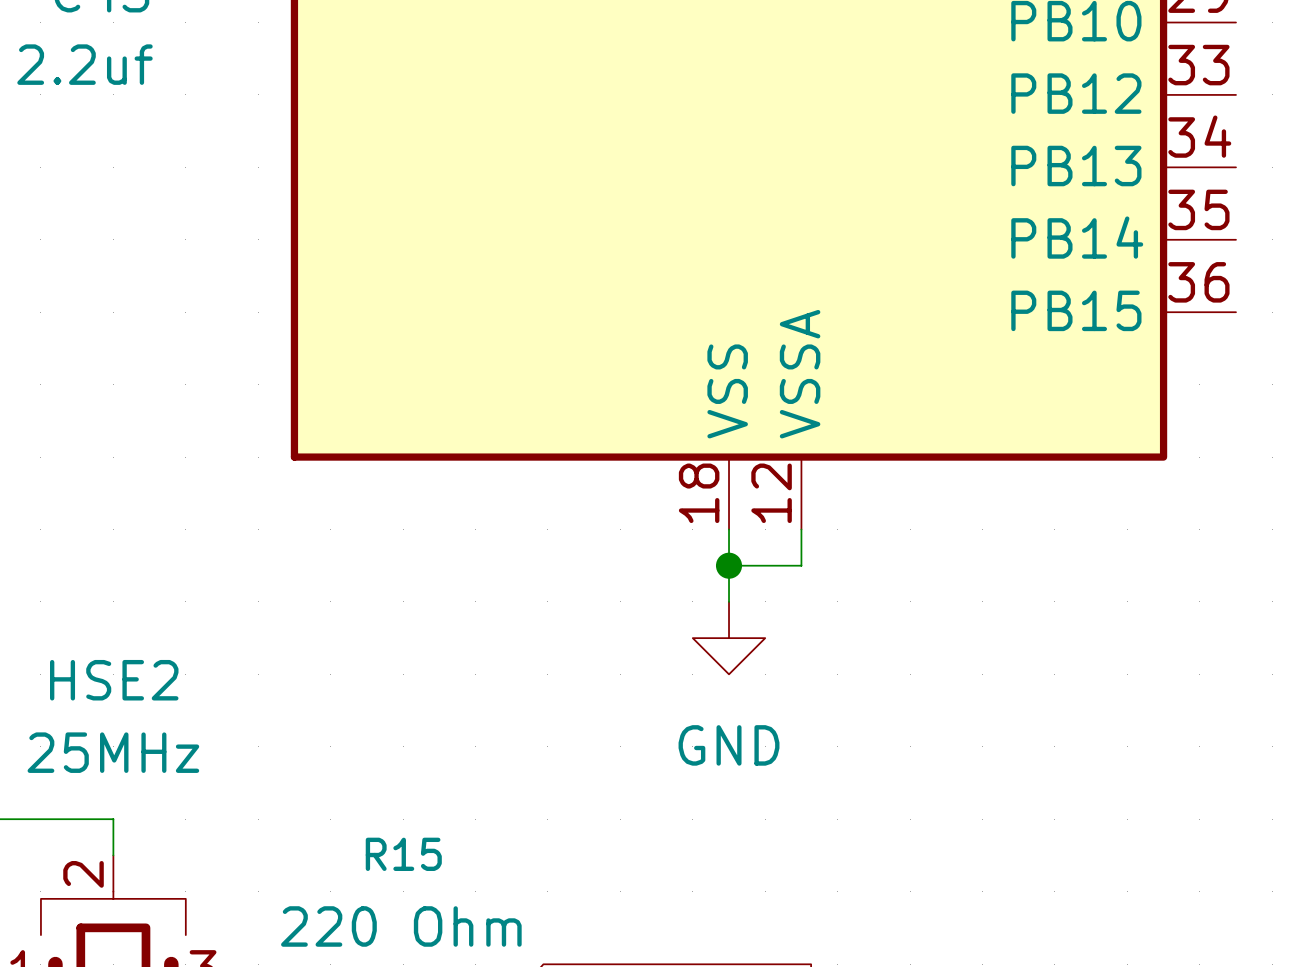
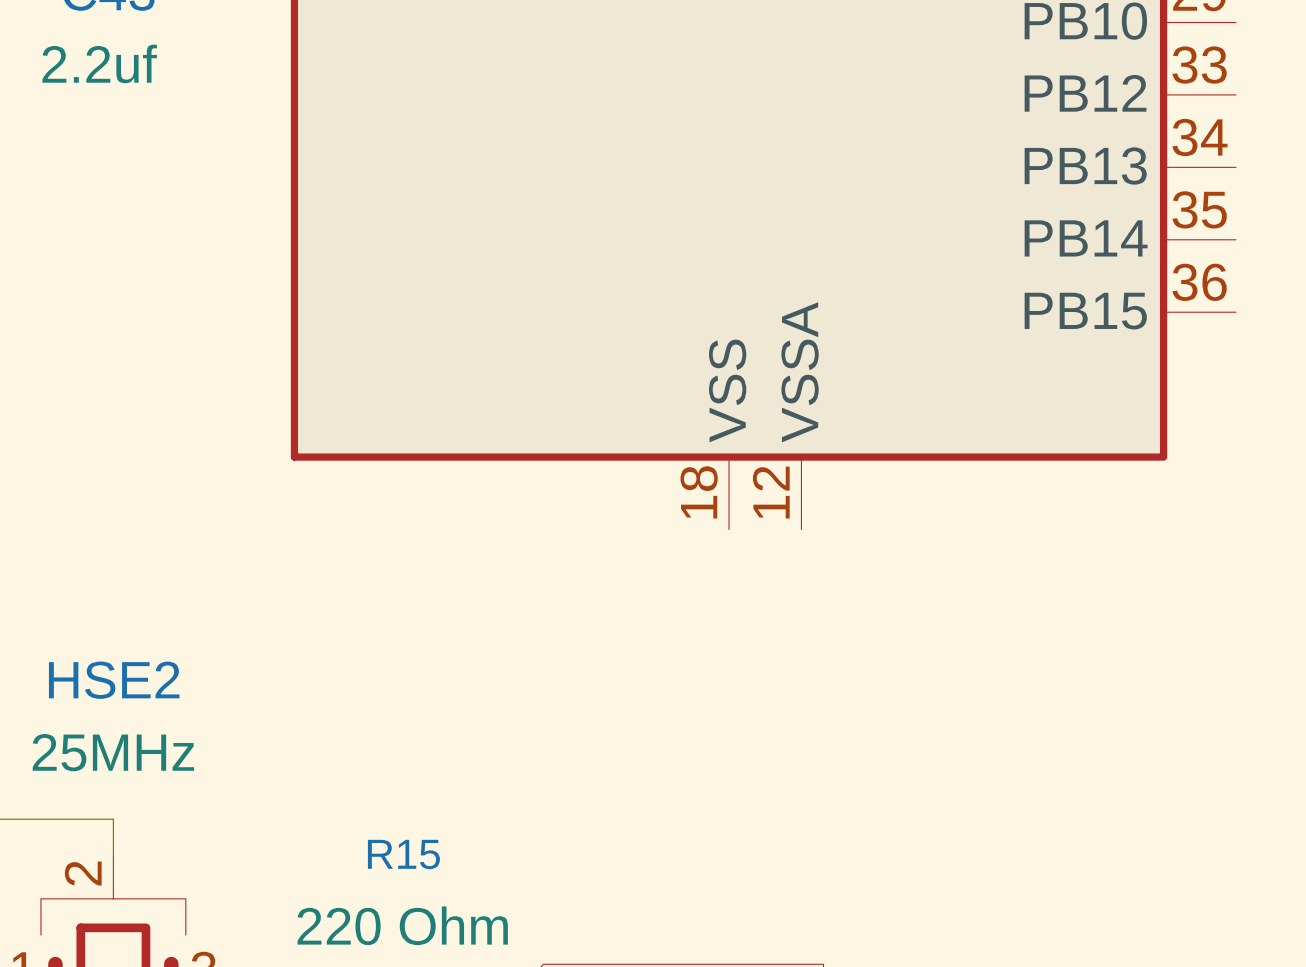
wire: (729, 529) (729, 601) -> none
wire: (801, 529) (801, 565) (729, 565) -> none
junction: (729, 565) -> none
power symbol: GND (729, 638) -> none

